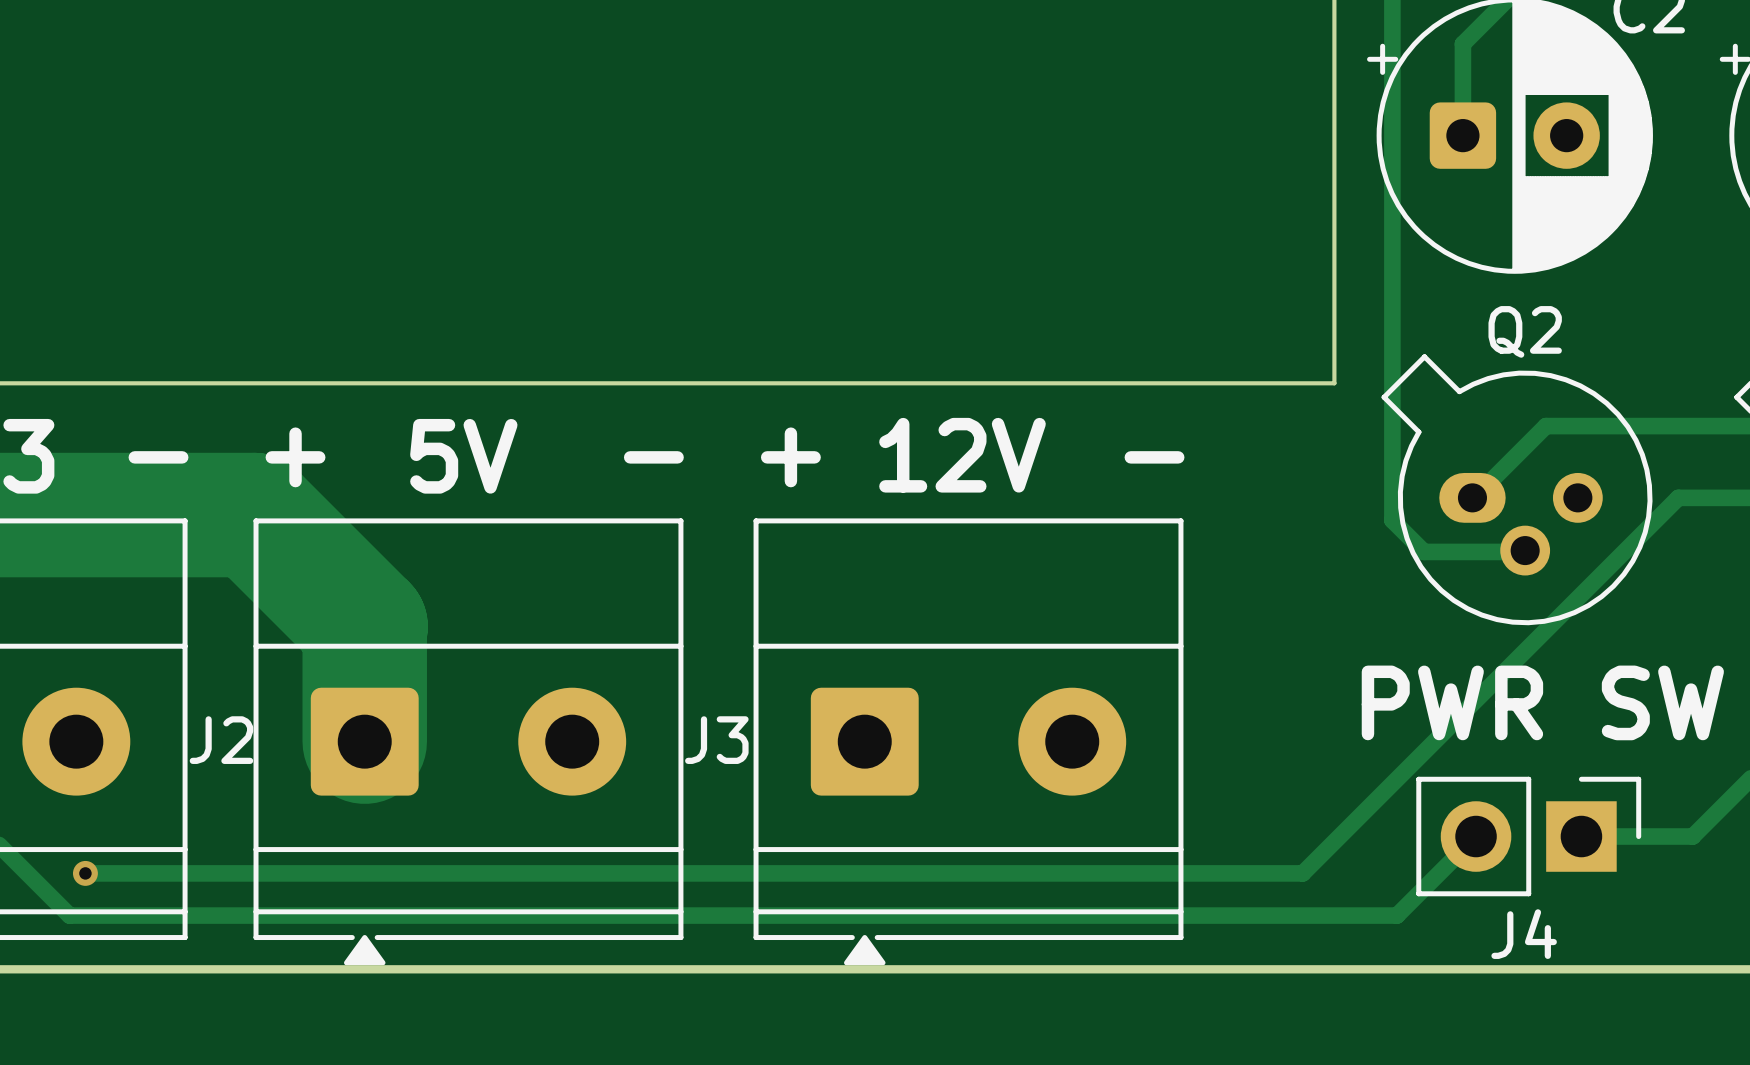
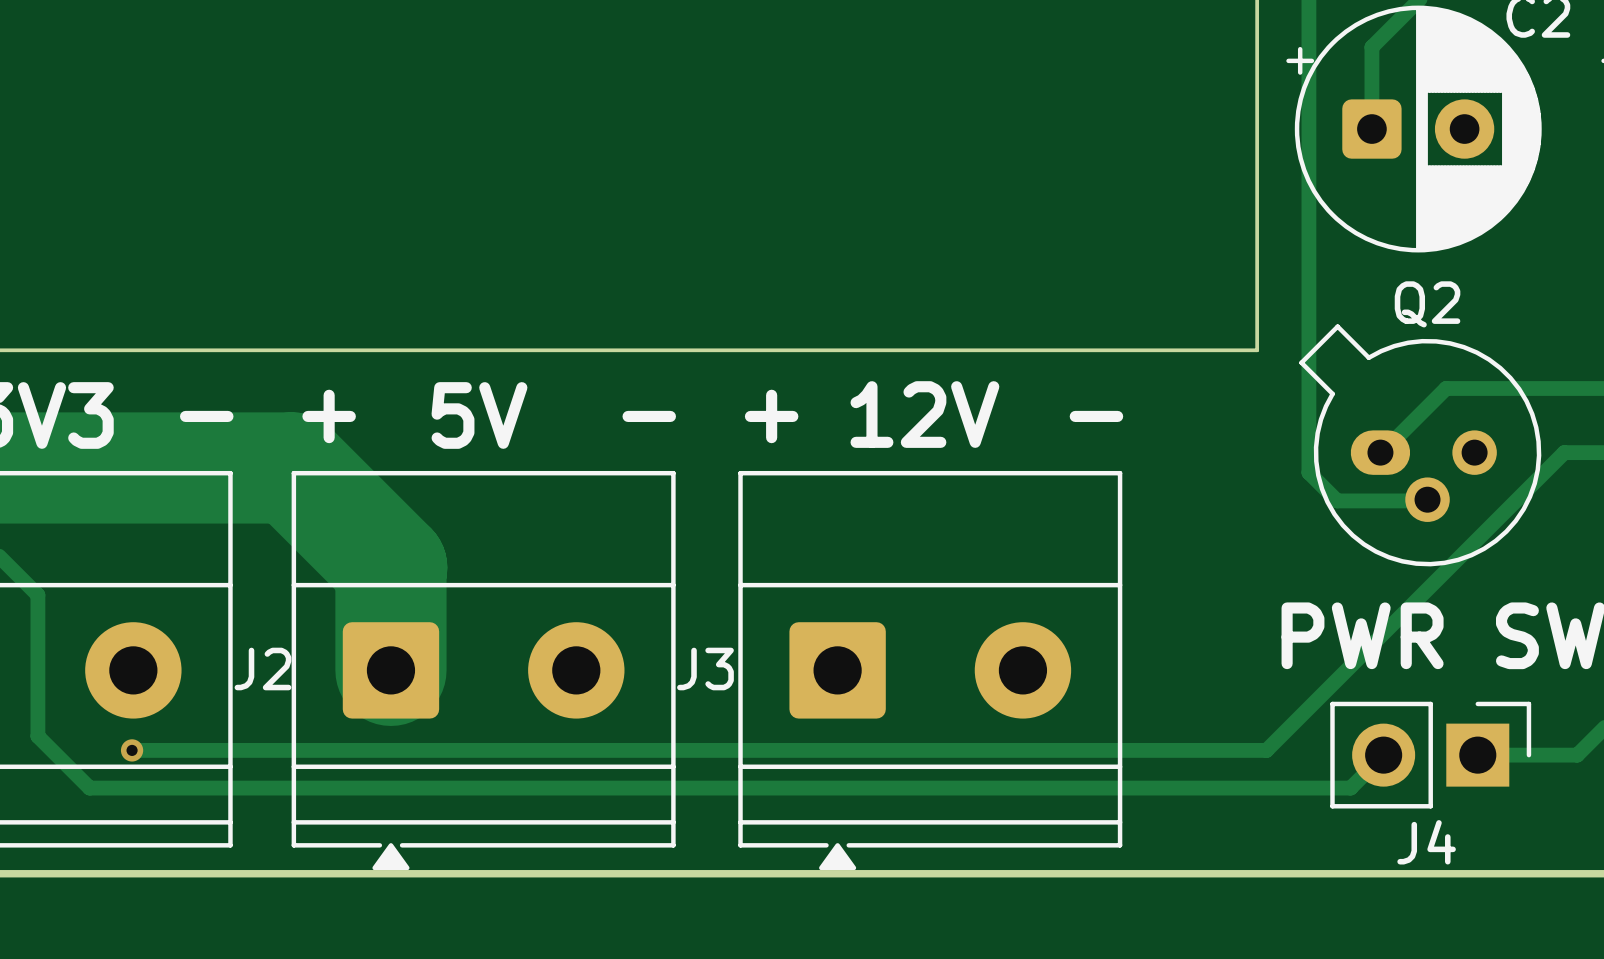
track: none -> (132, 750) (1266, 750)
track: (1344, 831) (1302, 873) -> (1350, 788) (1228, 788)
track: (27, 873) (69, 915) (1396, 915) (1439, 873) -> (89, 788) (141, 788)
via position: (85, 873) -> (132, 750)

